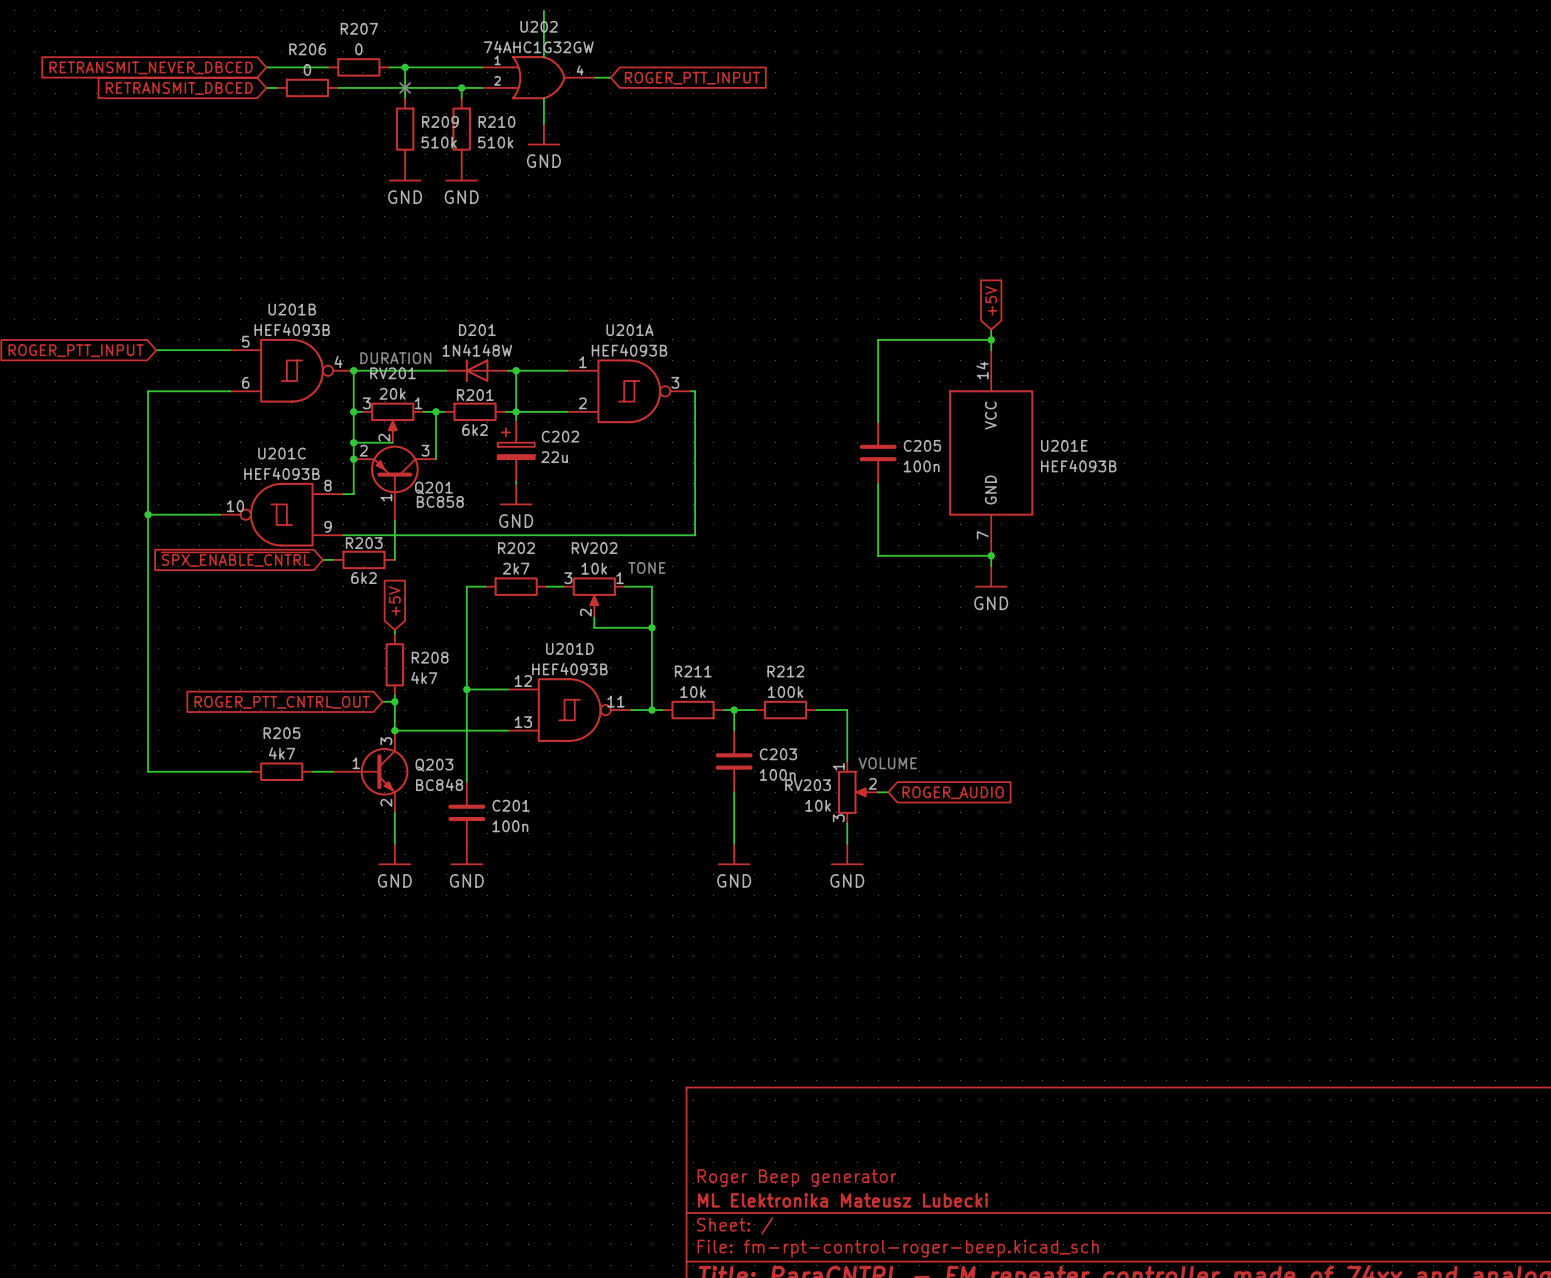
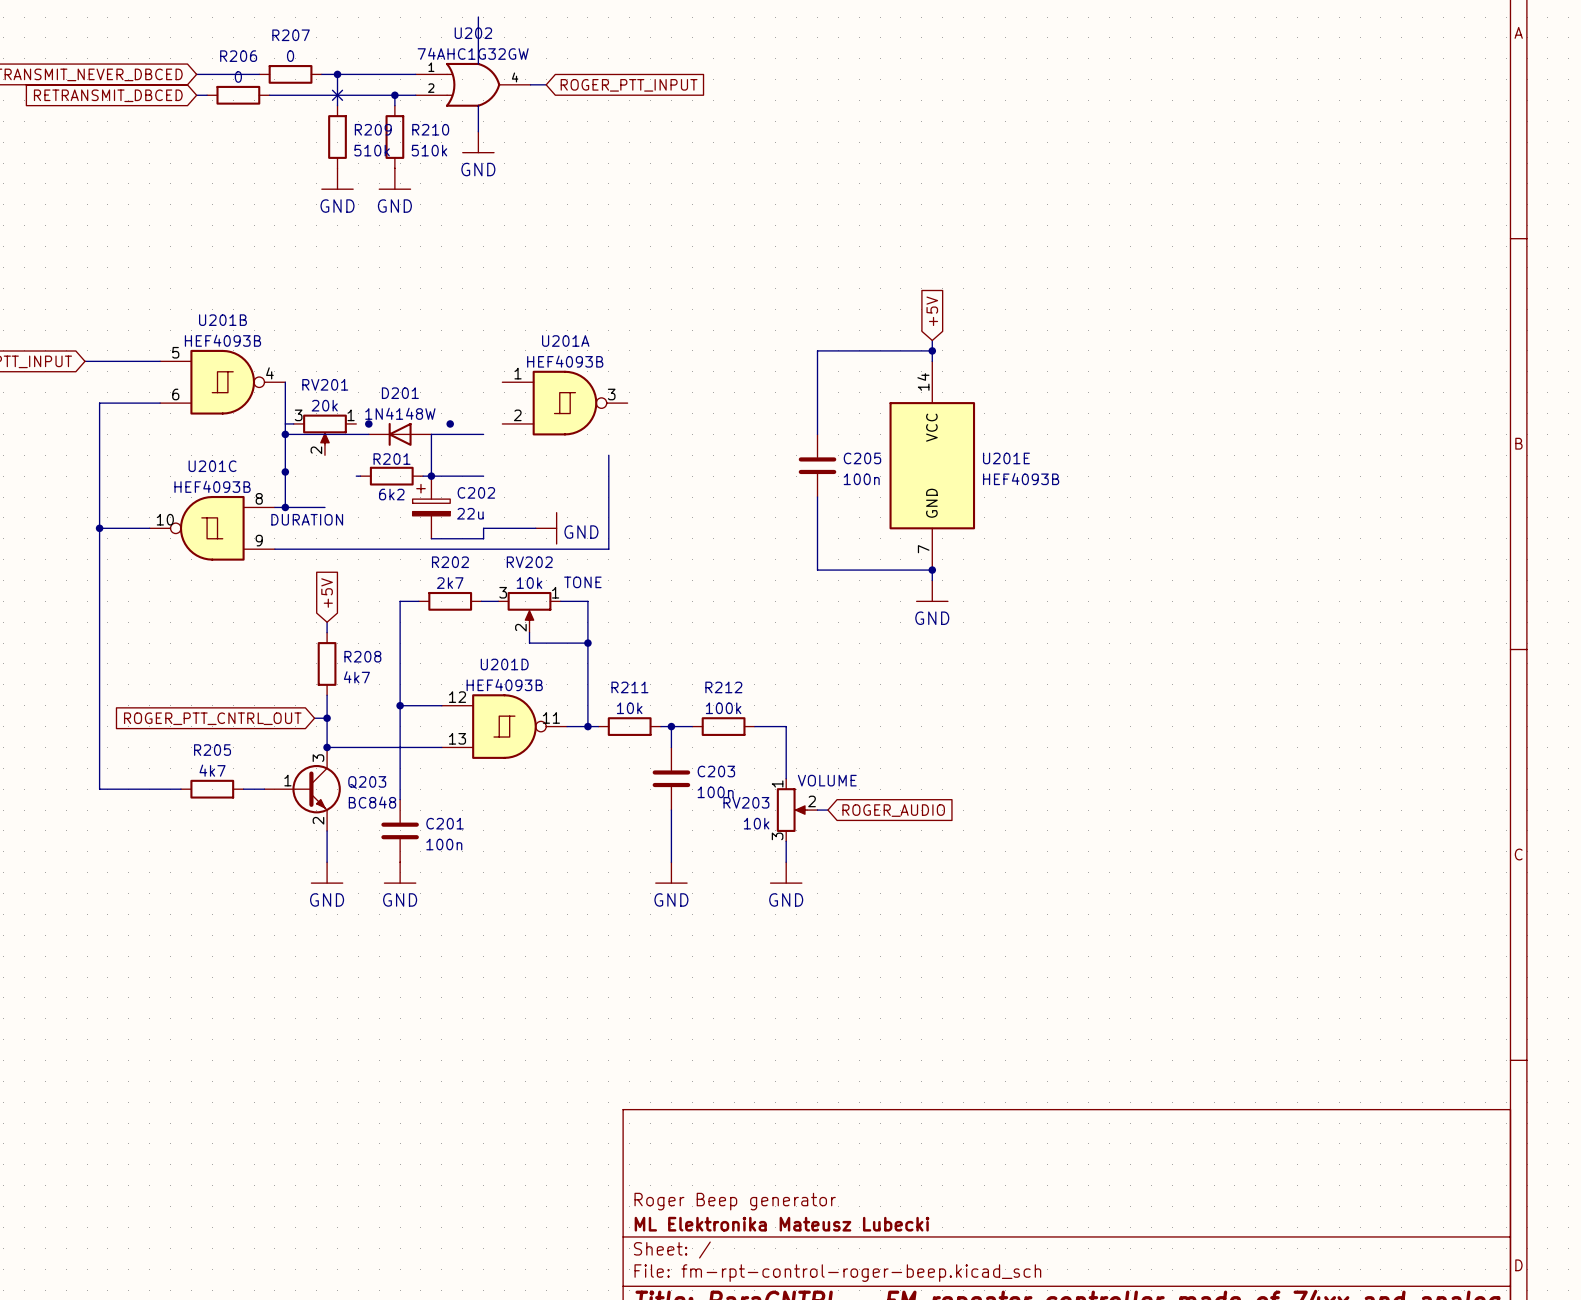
text position: DURATION (395, 358) -> DURATION (307, 519)
wire: (353, 370) (446, 370) -> none
junction: (353, 370) -> none
D201 position: (477, 370) -> (400, 434)
wire: (507, 370) (567, 370) -> (423, 476) (483, 476)
wire: (516, 370) (516, 420) -> none
junction: (516, 370) -> none
wire: (170, 391) (148, 391) (148, 771) (170, 771) -> (99, 403) (99, 789)
wire: (690, 391) (695, 391) (695, 535) (672, 535) -> (608, 455) (608, 549)
junction: (353, 411) -> none
wire: (423, 411) (444, 411) -> none
wire: (435, 411) (435, 459) -> none
R201 position: (475, 411) -> (391, 476)
wire: (505, 411) (567, 411) -> none
wire: none -> (285, 434) (368, 434)
junction: none -> (285, 434)
wire: none -> (483, 434) (431, 434) (431, 476)
wire: (353, 442) (392, 442) -> (285, 507) (324, 507)
junction: (353, 442) -> none
C202 position: (516, 450) -> (431, 507)
wire: none -> (356, 476) (360, 476)
junction: none -> (431, 476)
wire: (516, 481) (516, 483) -> none
Q201: BC858 (394, 483) -> none
junction: none -> (285, 507)
power symbol position: GND (516, 494) -> GND (546, 528)
power symbol rotation: 0° (516, 504) -> 90° counterclockwise (556, 528)
wire: (148, 514) (170, 514) -> none
junction position: (148, 514) -> (99, 528)
wire: none -> (535, 528) (483, 528) (483, 538) (431, 538)
wire: (394, 520) (394, 559) -> none
global label: ~{SPX_ENABLE_CNTRL} (235, 559) -> none
wire: (322, 559) (333, 559) -> none
R203: 6k2 (363, 559) -> none
global label position: +5V (394, 601) -> +5V (327, 593)
wire: none -> (327, 622) (327, 632)
wire: (394, 629) (394, 633) -> none
R208 position: (394, 664) -> (327, 663)

